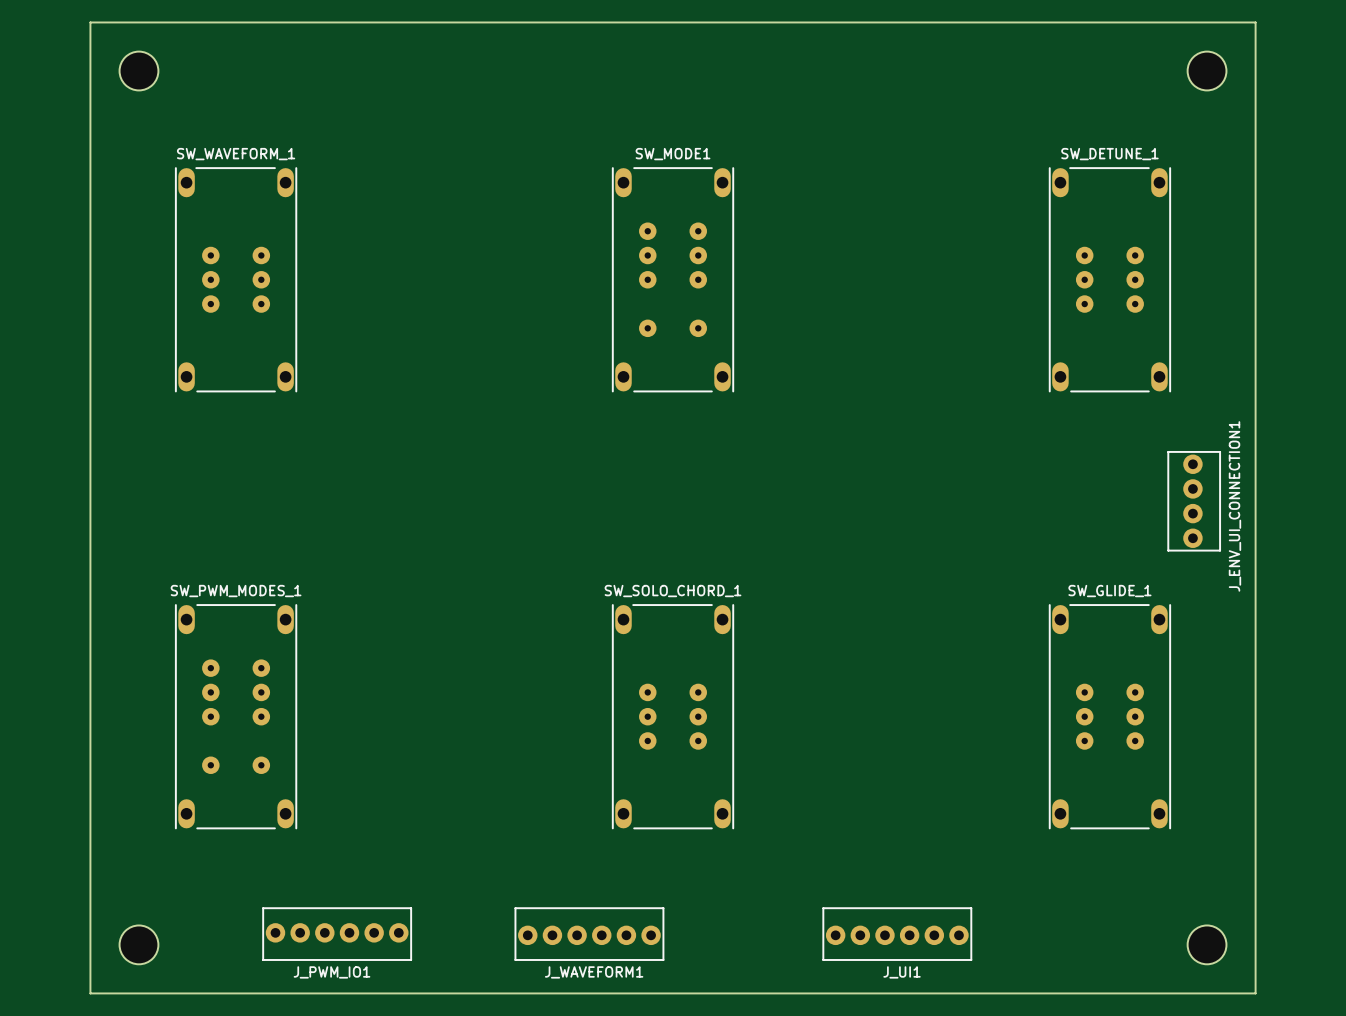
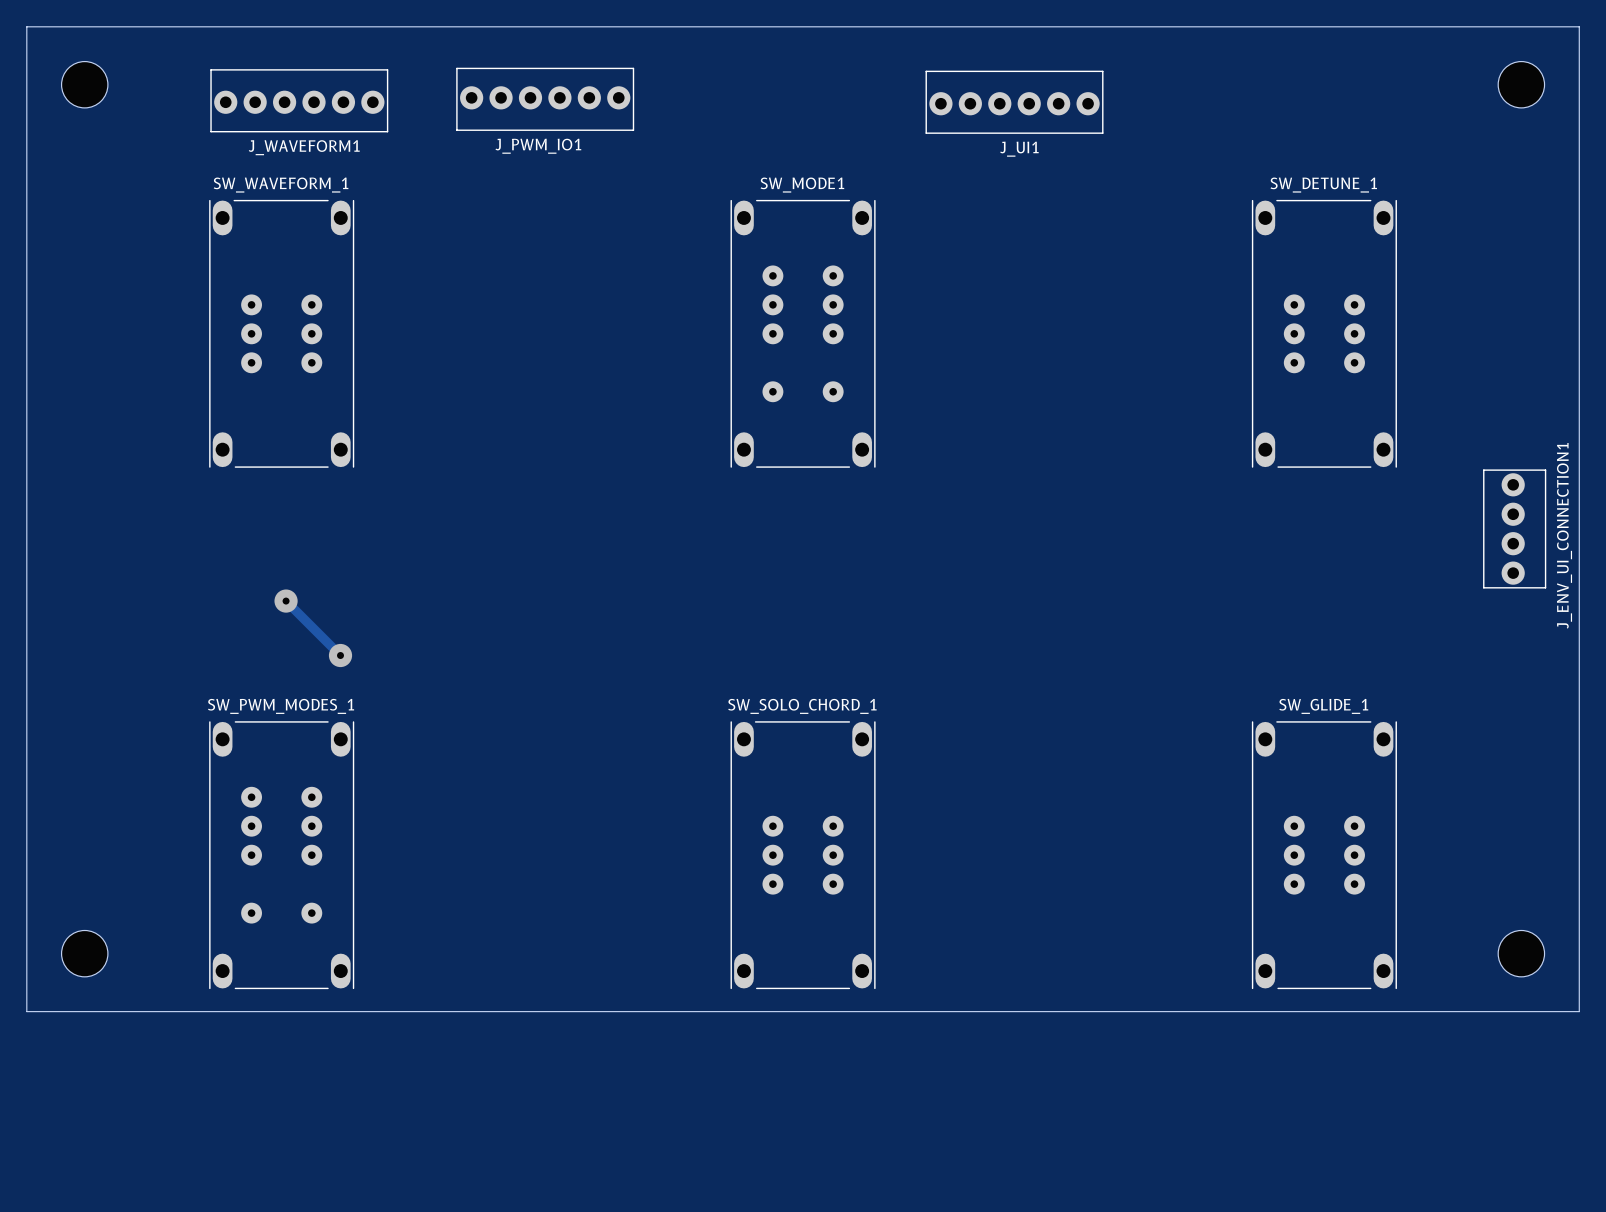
board edge: (90, 22) (90, 993) (1255, 993) (1255, 22) -> (107, 26) (26, 26) (26, 1011) (1579, 1011) (1579, 26) (1498, 26)
part position: (138, 71) -> (84, 84)
part position: (1207, 71) -> (1521, 84)
J_ENV_UI_CONNECTION1 position: (1194, 501) -> (1514, 528)
track: none -> (286, 601) (340, 655)
via: none -> (286, 601)
via: none -> (340, 655)
J_PWM_IO1 position: (337, 934) -> (545, 99)
J_WAVEFORM1 position: (589, 934) -> (299, 100)
J_UI1 position: (897, 934) -> (1014, 102)
part position: (138, 944) -> (84, 953)
part position: (1207, 944) -> (1521, 953)

